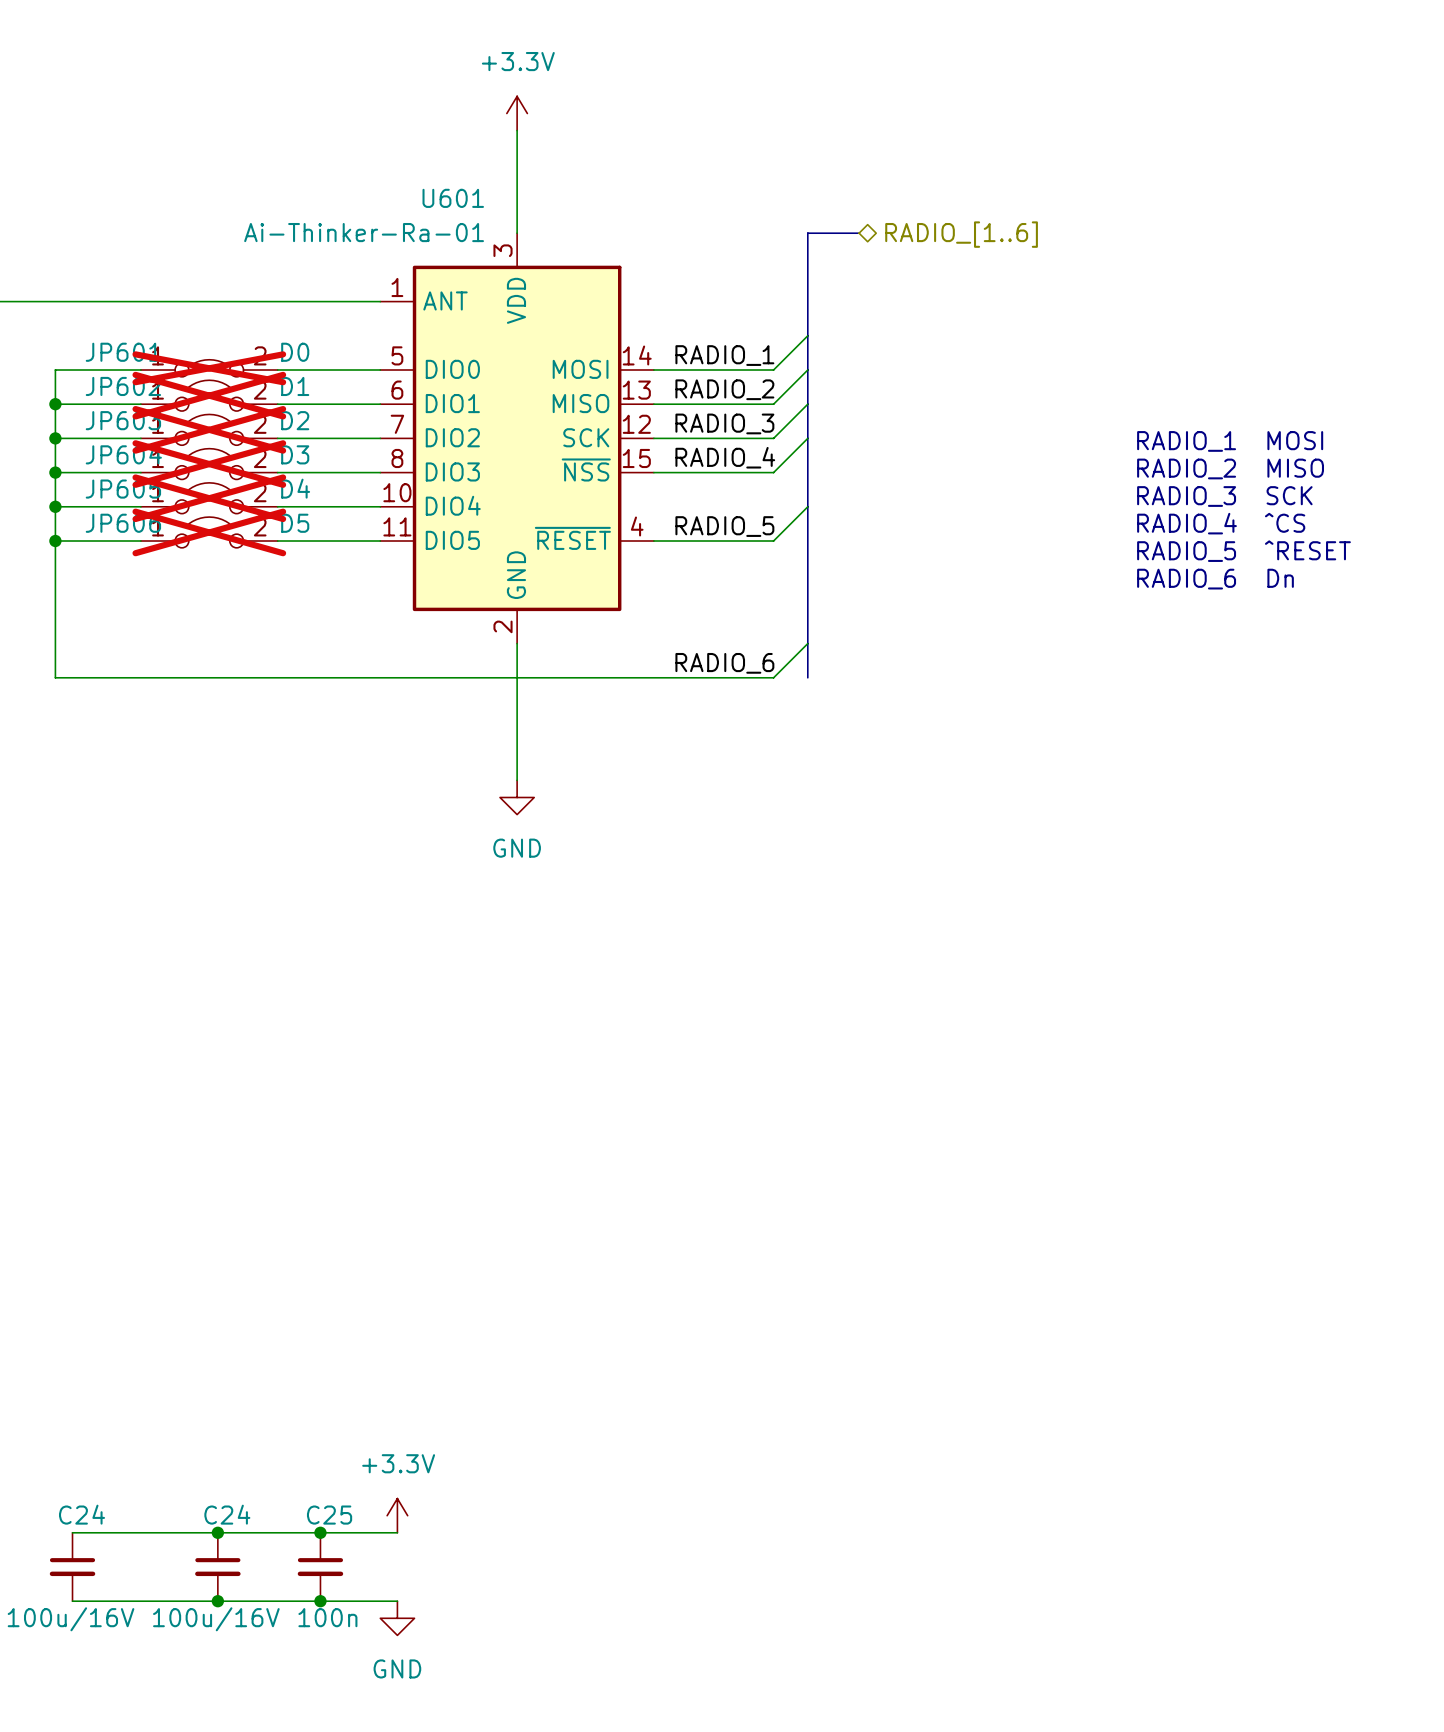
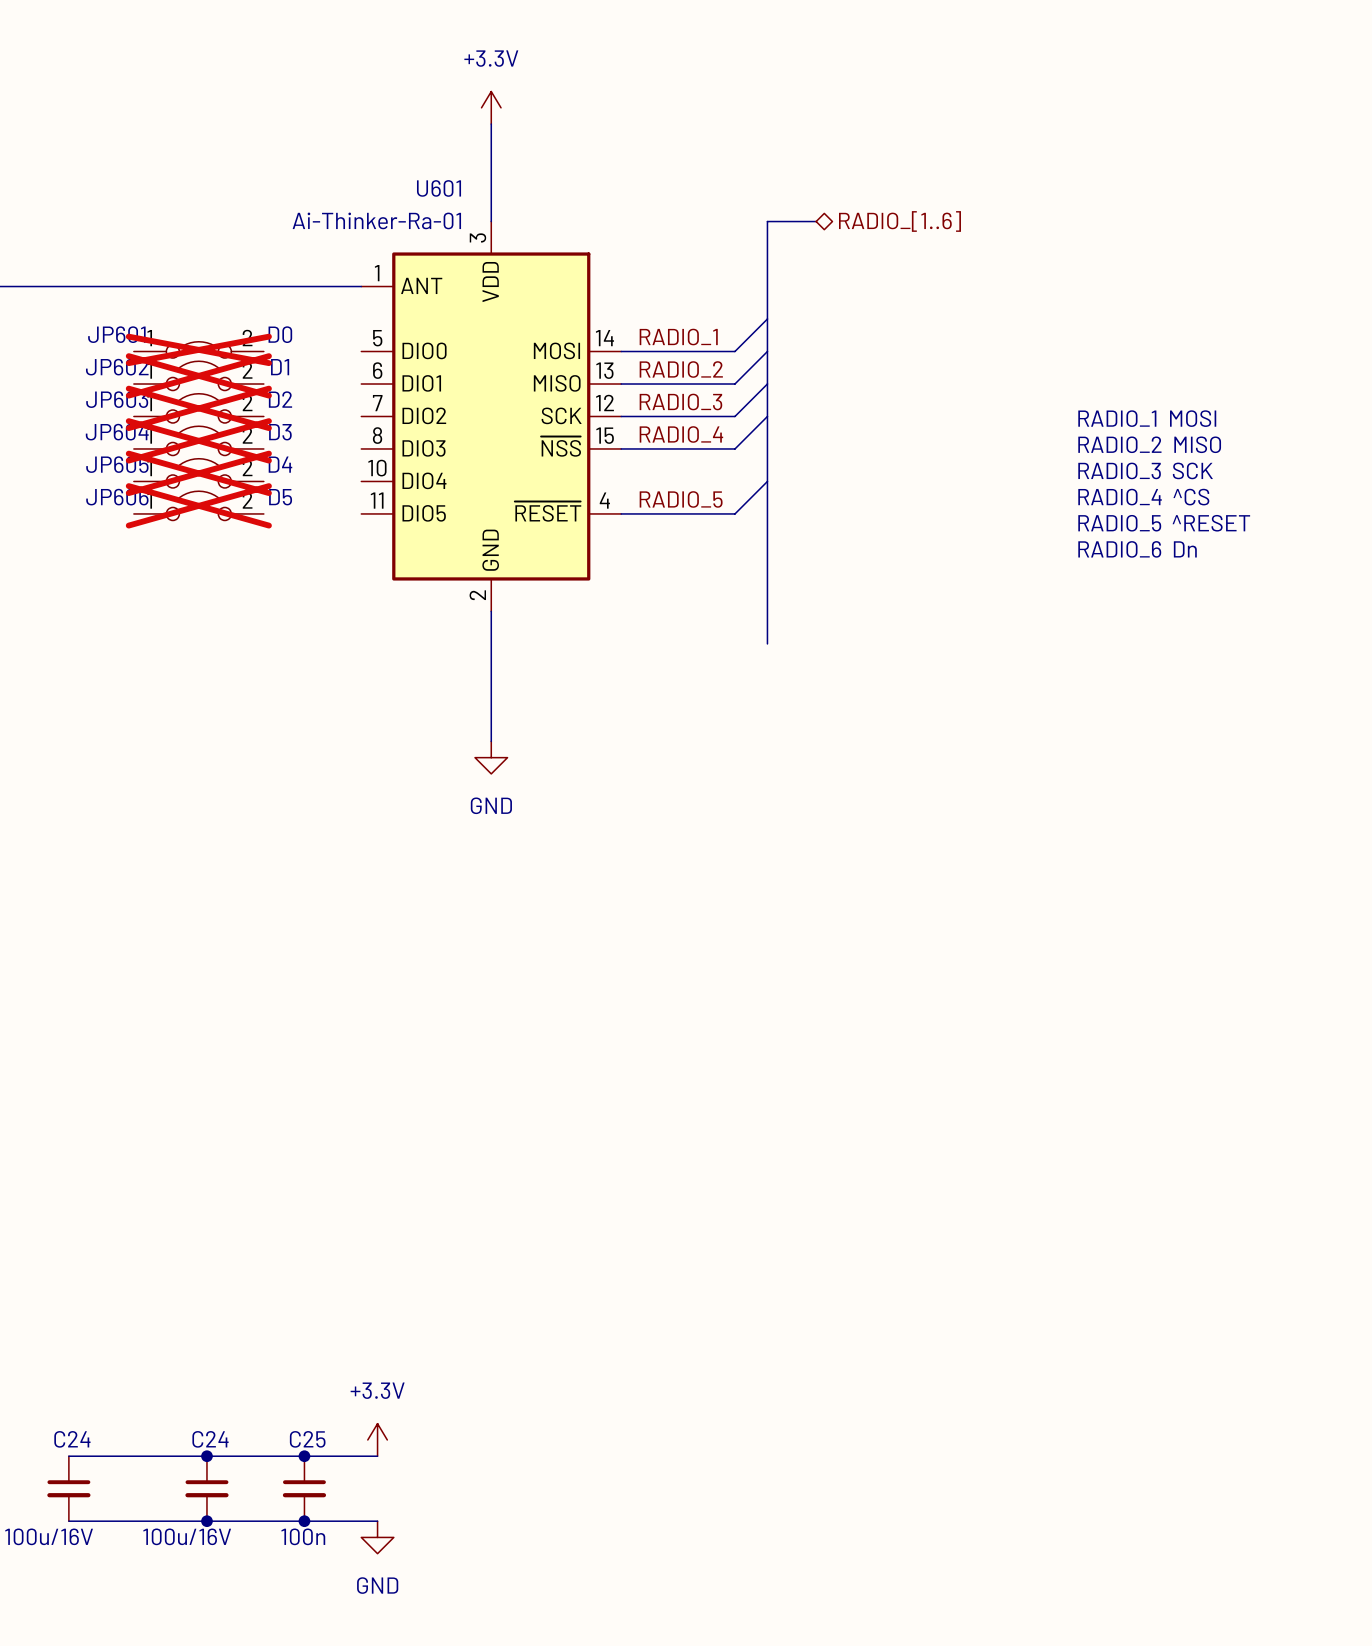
wire: (140, 370) (55, 370) (55, 677) (773, 677) (807, 643) -> none
wire: (277, 370) (380, 370) -> none
wire: (55, 404) (140, 404) -> none
junction: (55, 404) -> none
wire: (277, 404) (380, 404) -> none
wire: (55, 438) (140, 438) -> none
junction: (55, 438) -> none
wire: (277, 438) (380, 438) -> none
wire: (55, 472) (140, 472) -> none
junction: (55, 472) -> none
wire: (277, 472) (380, 472) -> none
wire: (55, 506) (140, 506) -> none
junction: (55, 506) -> none
wire: (277, 506) (380, 506) -> none
wire: (55, 541) (140, 541) -> none
junction: (55, 541) -> none
wire: (277, 541) (380, 541) -> none
label: RADIO_6 (724, 663) -> none

